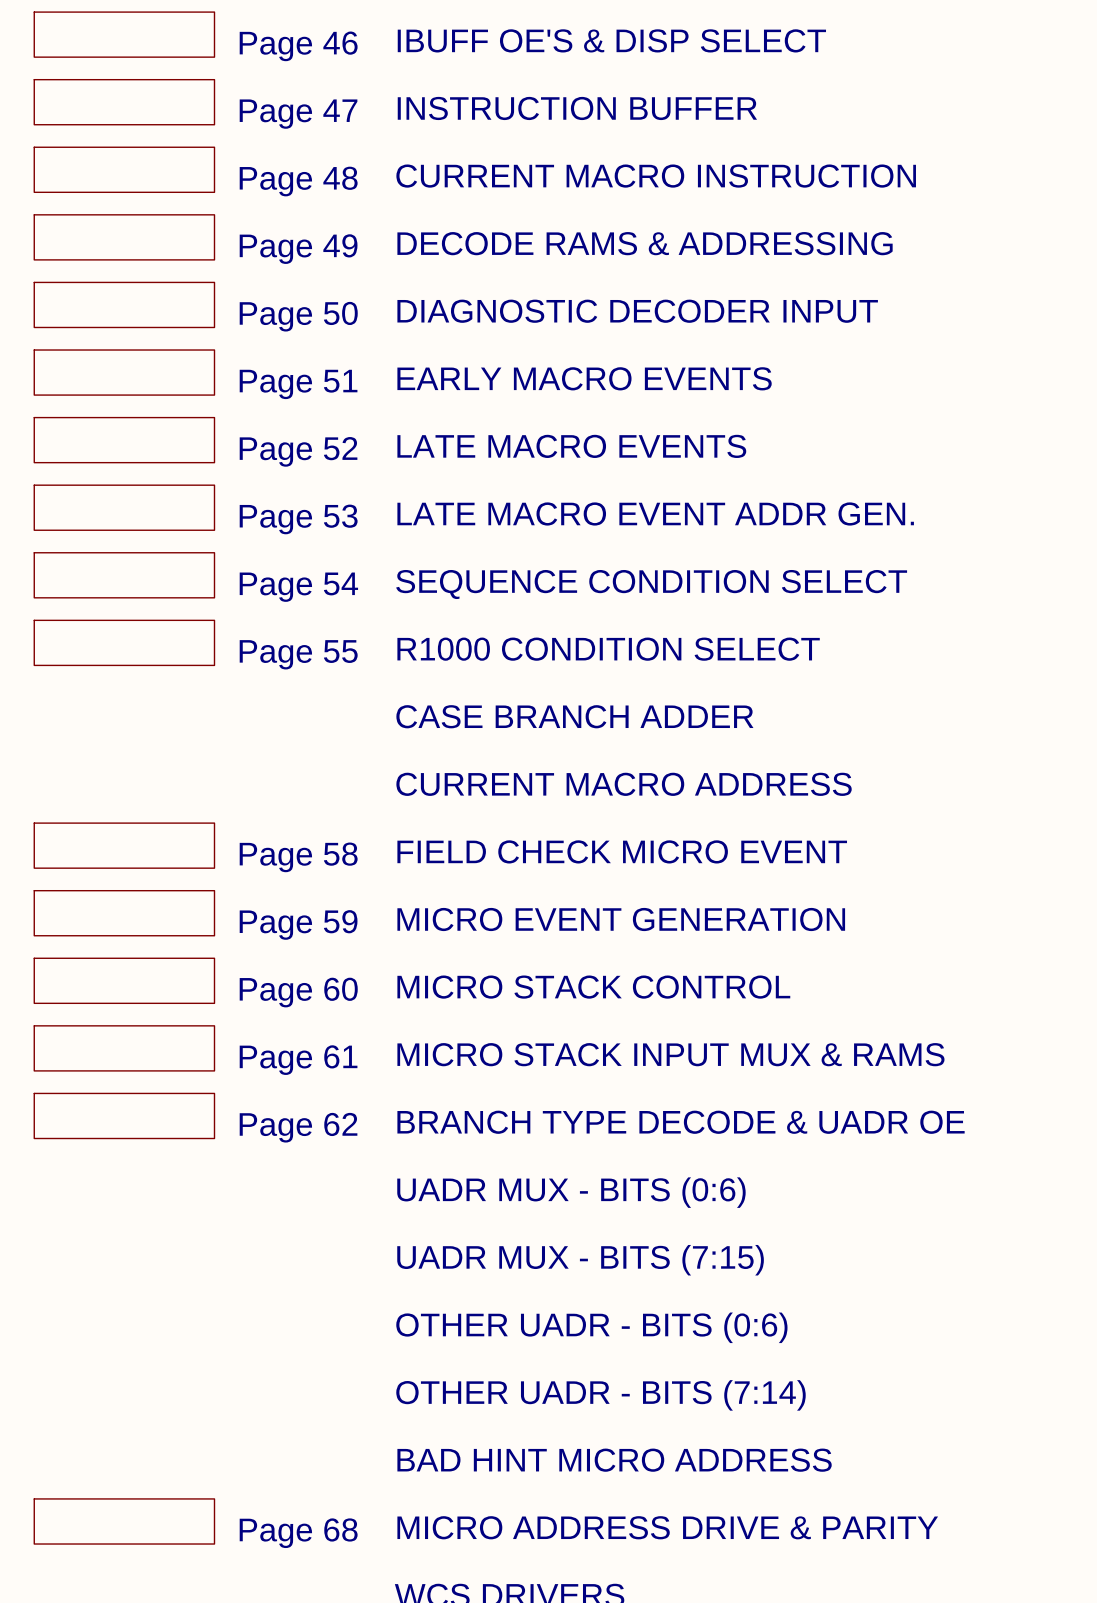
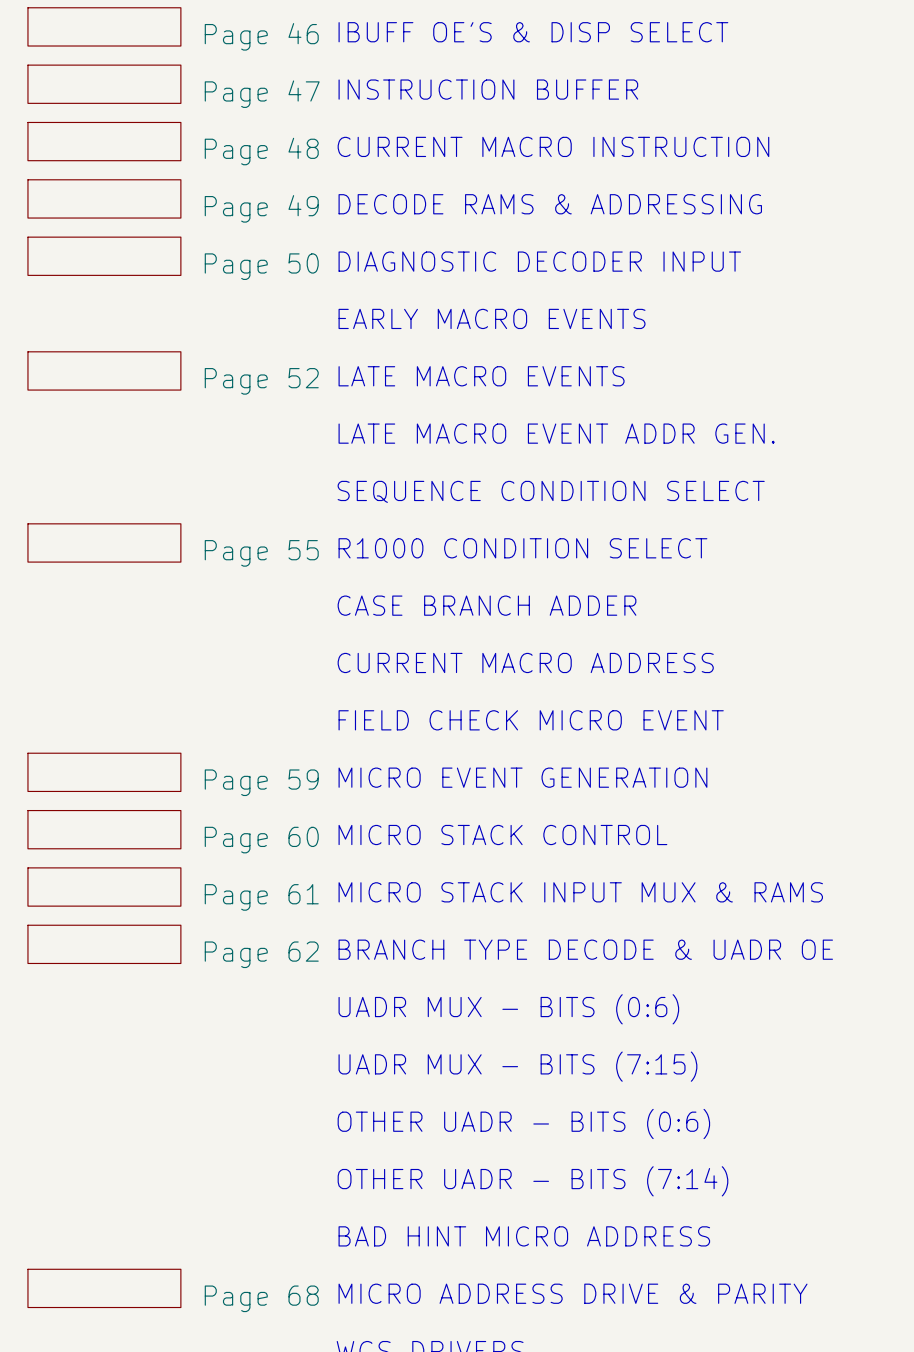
sheet Page 51: (124, 372) -> none
sheet Page 53: (124, 507) -> none
sheet Page 54: (124, 575) -> none
sheet Page 58: (124, 845) -> none

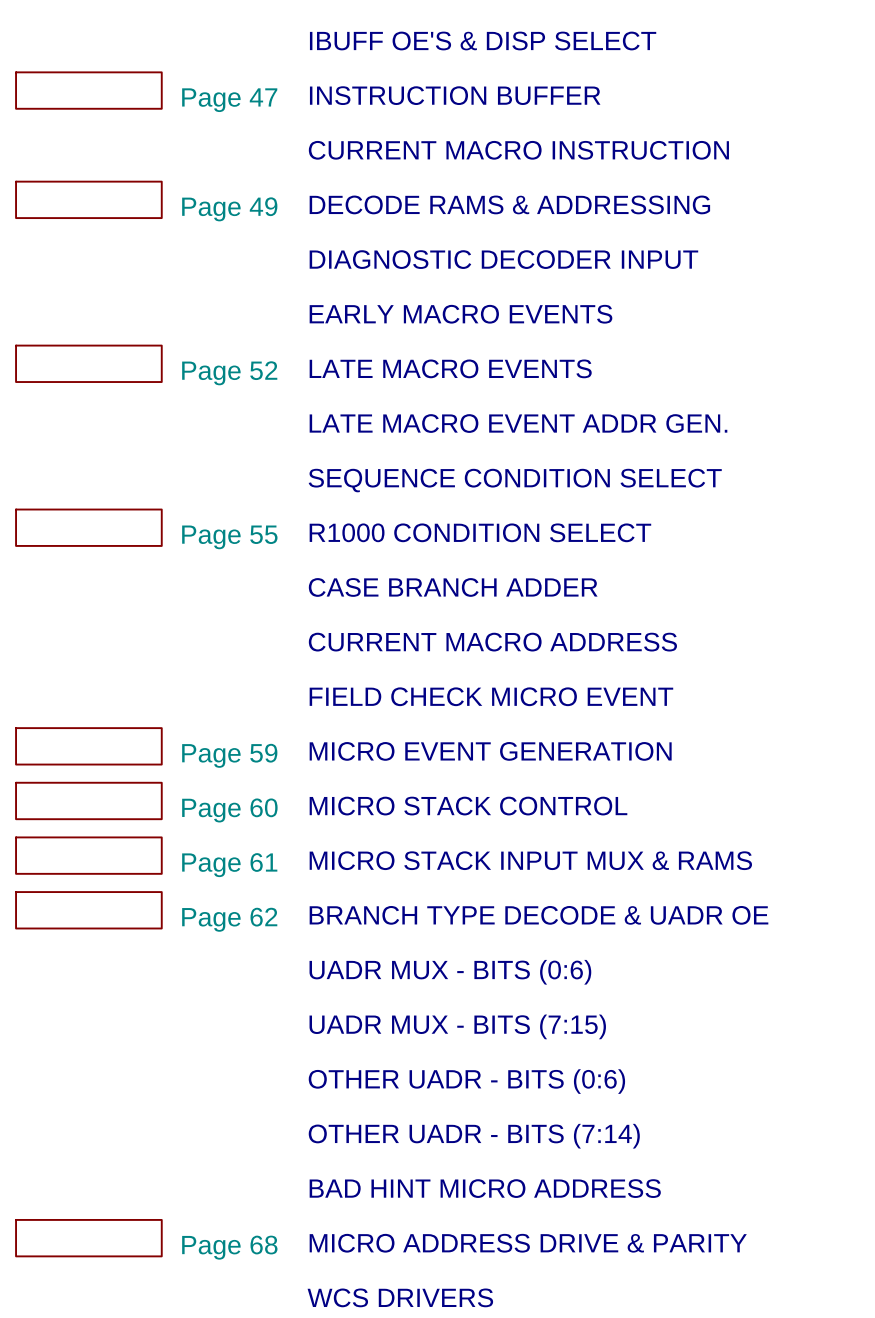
sheet Page 46: (104, 26) -> none
sheet Page 48: (104, 141) -> none
sheet Page 50: (104, 256) -> none

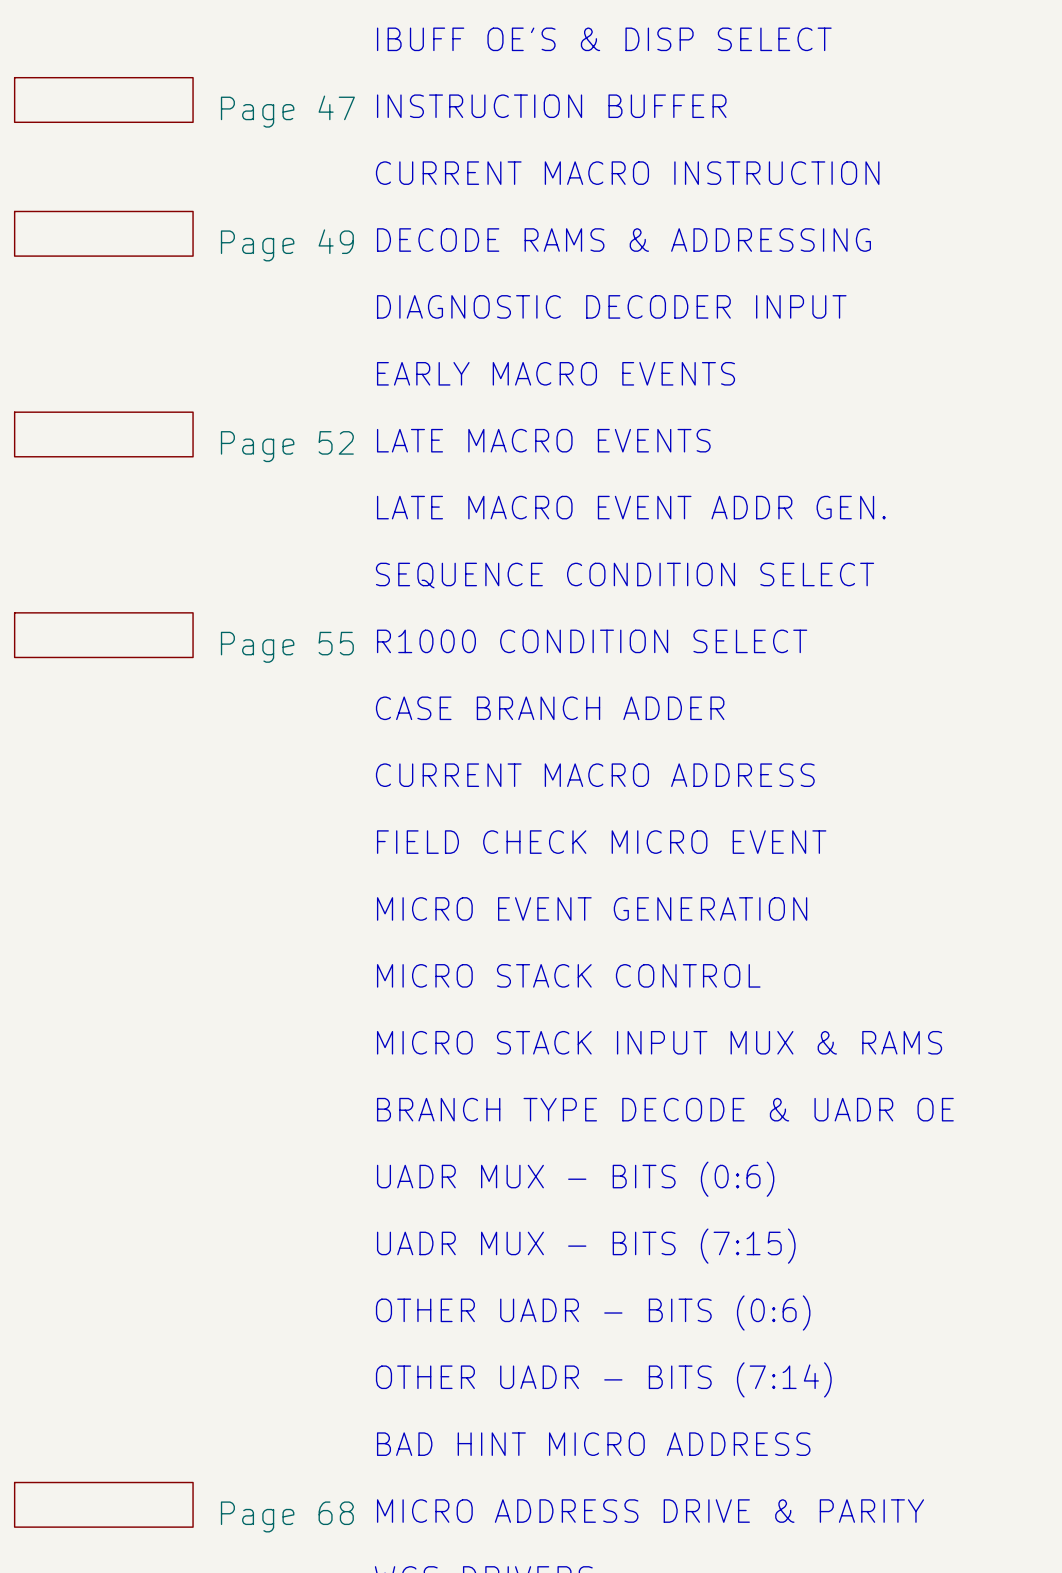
sheet Page 59: (88, 746) -> none
sheet Page 60: (88, 800) -> none
sheet Page 61: (88, 855) -> none
sheet Page 62: (88, 910) -> none

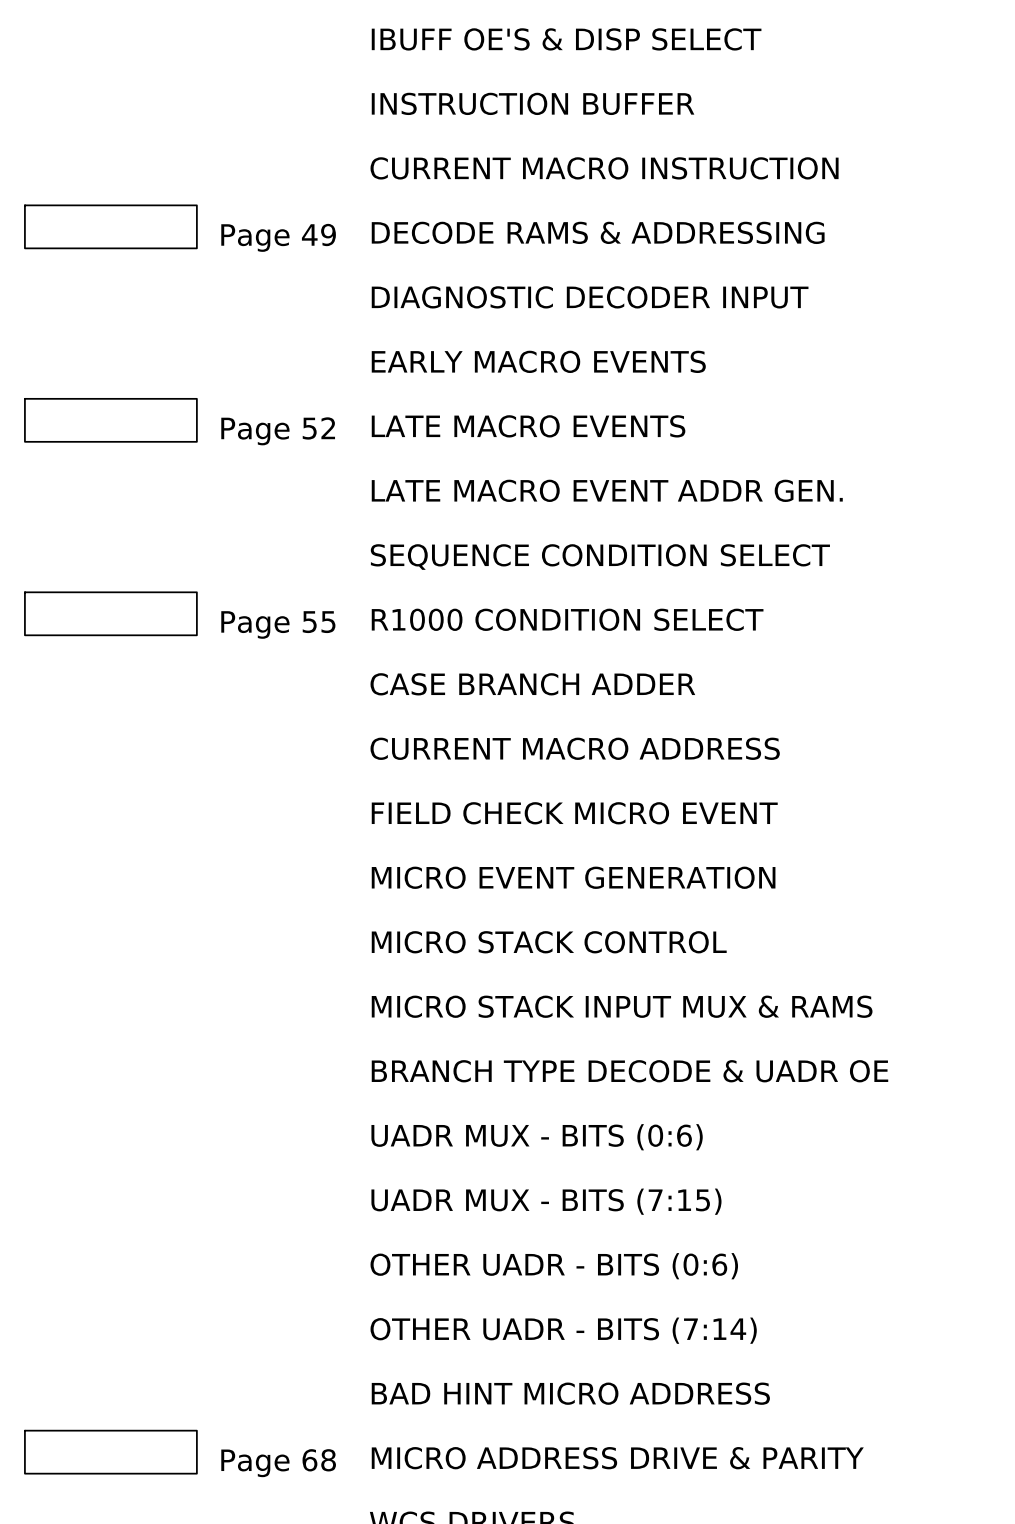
sheet Page 47: (103, 99) -> none

